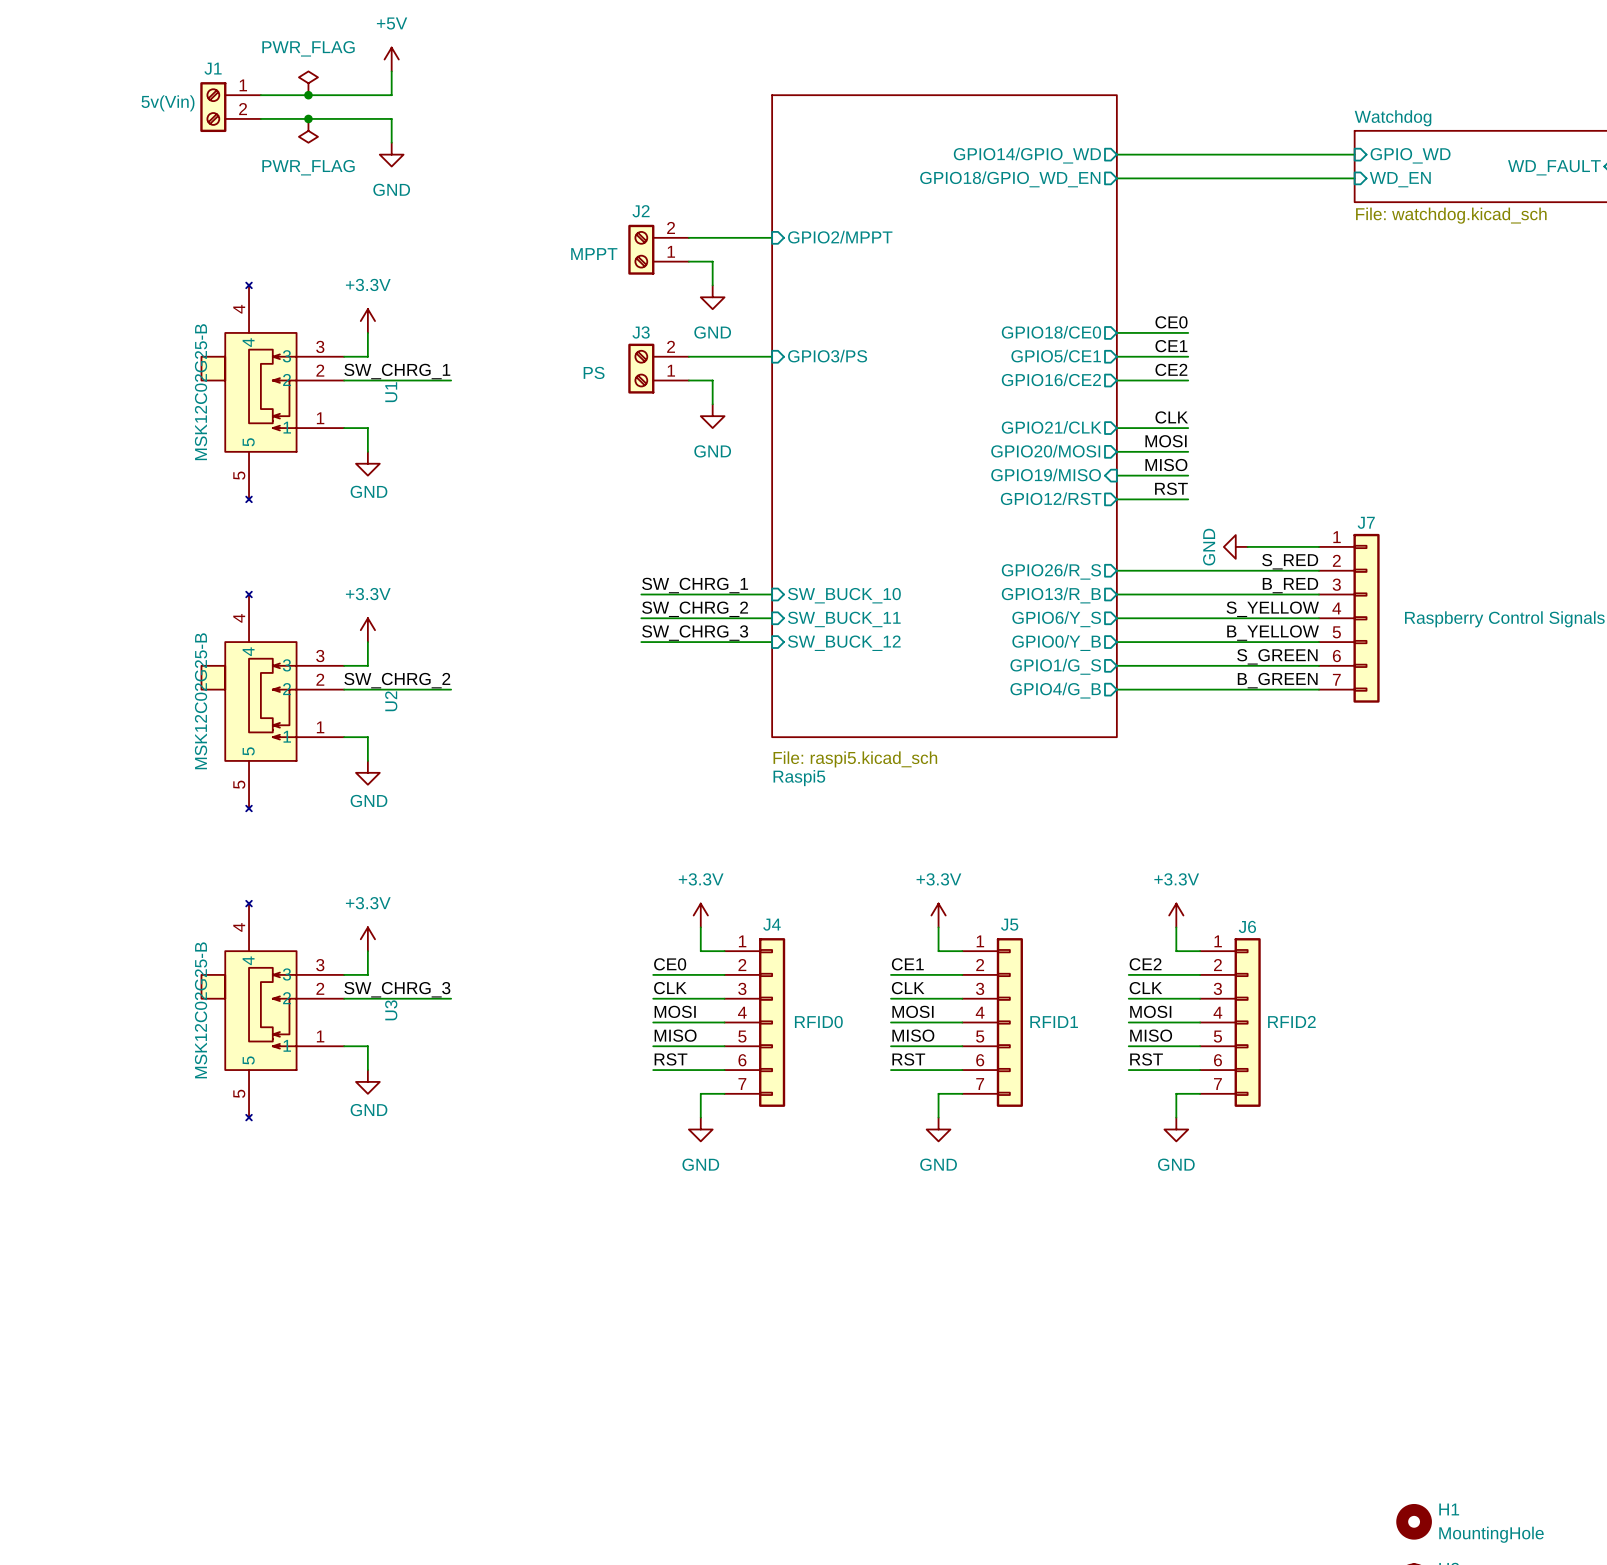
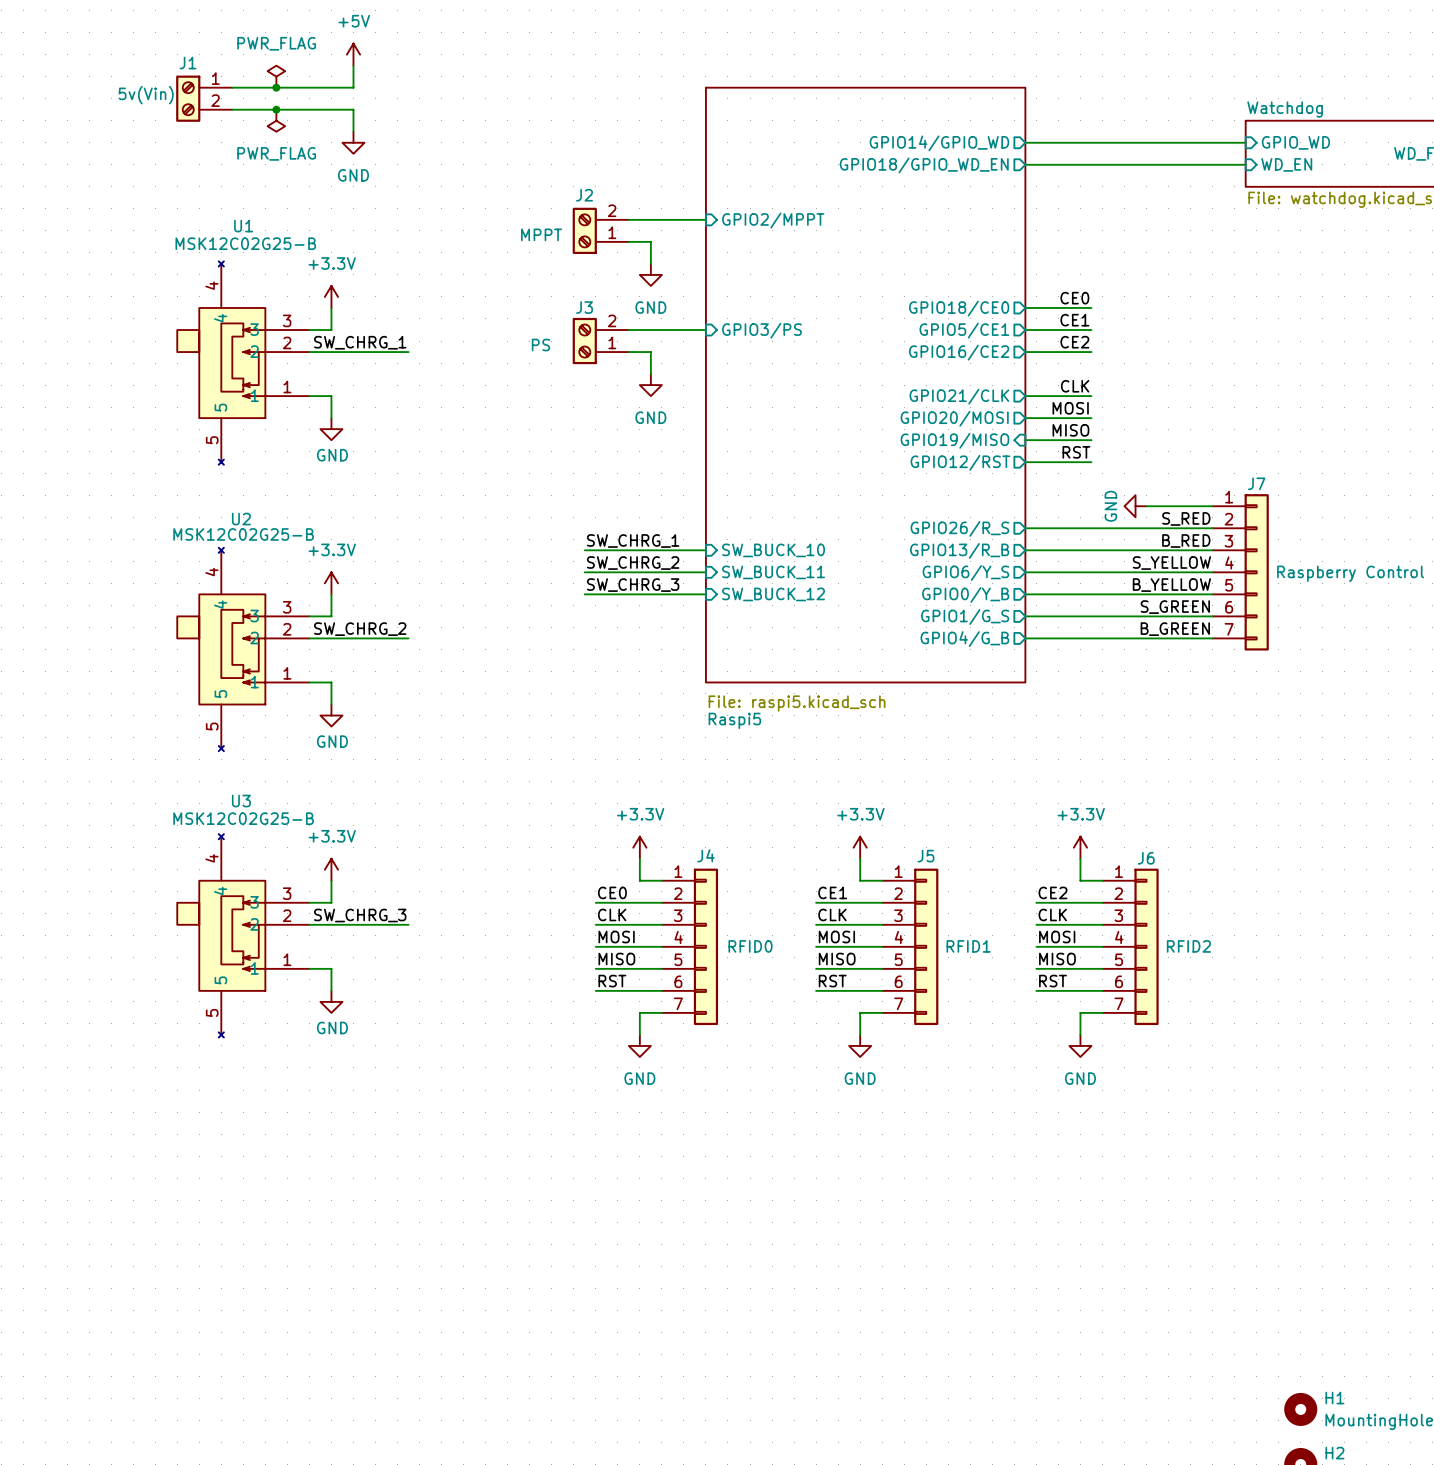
U1 value rotation: 0° (201, 392) -> 90° clockwise (245, 243)
U1 name rotation: 0° (391, 392) -> 90° clockwise (243, 226)
U1 name position: U1 (391, 392) -> U1 (243, 226)
U2 value rotation: 0° (201, 701) -> 90° clockwise (243, 534)
U2 name rotation: 0° (391, 701) -> 90° clockwise (241, 519)
U2 name position: U2 (391, 701) -> U2 (241, 519)
U3 value rotation: 0° (201, 1010) -> 90° clockwise (243, 818)
U3 name rotation: 0° (391, 1010) -> 90° clockwise (241, 801)
U3 name position: U3 (391, 1010) -> U3 (241, 801)

